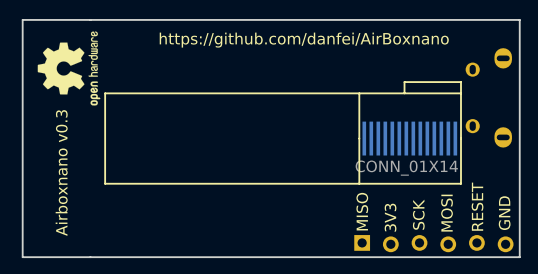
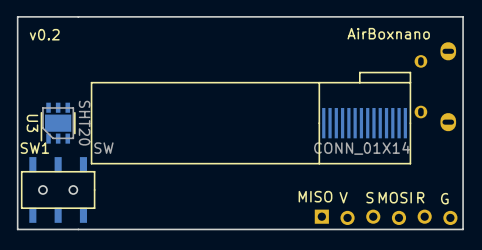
drawing: [37, 31, 101, 106] -> none
text: none -> AirBoxnano (388, 33)
text: none -> v0.2 (44, 34)
text: https://github.com/danfei/AirBoxnano (304, 40) -> none
U3: none -> SHT20 (58, 123)
text: Airboxnano v0.3 (61, 173) -> none
text: RESET (477, 206) -> none
text rotation: 0° (362, 211) -> 90° clockwise (315, 196)
SW1: none -> SW (58, 189)
text rotation: 0° (447, 213) -> 90° clockwise (395, 197)
text: GND (504, 213) -> none
text: SCK (418, 214) -> S (369, 197)
text: 3V3 (390, 217) -> V (343, 197)
text: none -> R (420, 197)
text: none -> G (444, 198)

